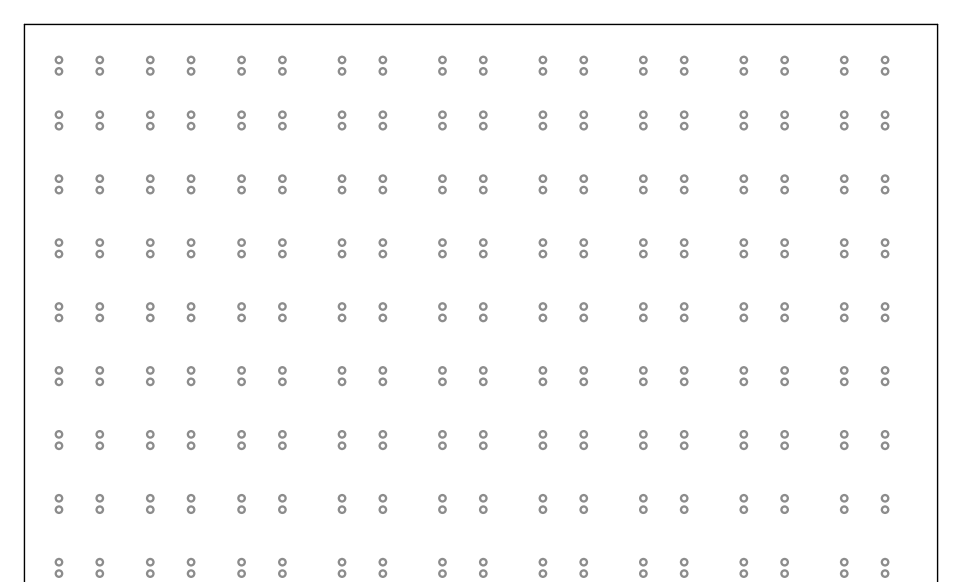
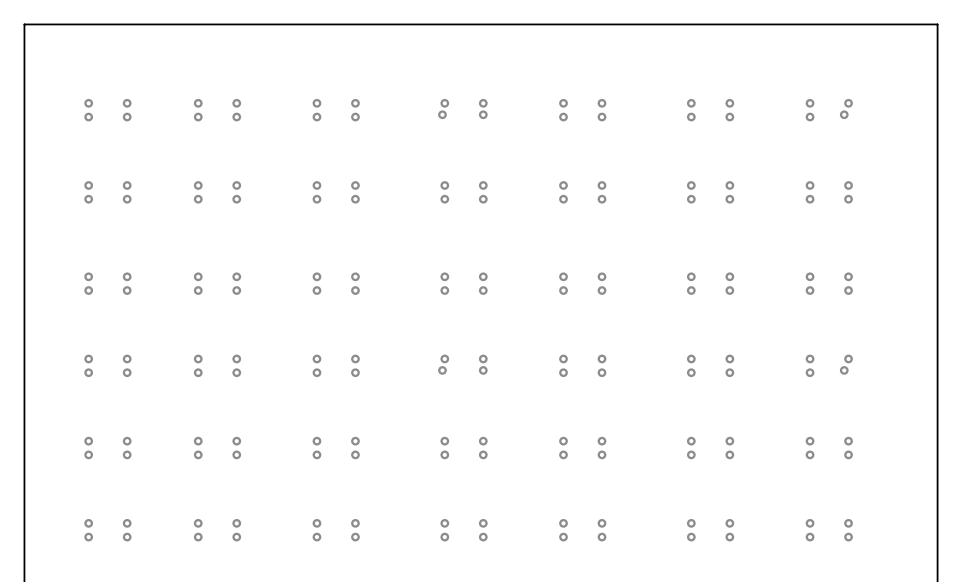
part: (58, 59) -> none
part: (99, 59) -> none
part: (150, 59) -> none
part: (191, 59) -> none
part: (241, 59) -> none
part: (282, 59) -> none
part: (342, 59) -> none
part: (382, 59) -> none
part: (442, 59) -> none
part: (483, 59) -> none
part: (542, 59) -> none
part: (583, 59) -> none
part: (643, 59) -> none
part: (684, 59) -> none
part: (743, 59) -> none
part: (784, 59) -> none
part: (844, 59) -> none
part: (885, 59) -> none
part: (58, 71) -> none
part: (99, 71) -> none
part: (150, 71) -> none
part: (191, 71) -> none
part: (241, 71) -> none
part: (282, 71) -> none
part: (342, 71) -> none
part: (382, 71) -> none
part: (442, 71) -> none
part: (483, 71) -> none
part: (542, 71) -> none
part: (583, 71) -> none
part: (643, 71) -> none
part: (684, 71) -> none
part: (743, 71) -> none
part: (784, 71) -> none
part: (844, 71) -> none
part: (885, 71) -> none
part: none -> (88, 103)
part: none -> (127, 103)
part: none -> (198, 103)
part: none -> (236, 103)
part: none -> (316, 103)
part: none -> (355, 103)
part: none -> (444, 103)
part: none -> (483, 103)
part: none -> (563, 103)
part: none -> (602, 103)
part: none -> (691, 103)
part: none -> (729, 103)
part: none -> (810, 103)
part: none -> (848, 103)
part: (58, 114) -> none
part: (99, 114) -> none
part: (150, 114) -> none
part: (191, 114) -> none
part: (241, 114) -> none
part: (282, 114) -> none
part: (342, 114) -> none
part: (382, 114) -> none
part: (542, 114) -> none
part: (583, 114) -> none
part: (643, 114) -> none
part: (684, 114) -> none
part: (743, 114) -> none
part: (784, 114) -> none
part: (885, 114) -> none
part: none -> (88, 117)
part: none -> (127, 117)
part: none -> (198, 117)
part: none -> (236, 117)
part: none -> (316, 117)
part: none -> (355, 117)
part: none -> (563, 117)
part: none -> (602, 117)
part: none -> (691, 117)
part: none -> (729, 117)
part: none -> (810, 117)
part: (58, 126) -> none
part: (99, 126) -> none
part: (150, 126) -> none
part: (191, 126) -> none
part: (241, 126) -> none
part: (282, 126) -> none
part: (342, 126) -> none
part: (382, 126) -> none
part: (442, 126) -> none
part: (483, 126) -> none
part: (542, 126) -> none
part: (583, 126) -> none
part: (643, 126) -> none
part: (684, 126) -> none
part: (743, 126) -> none
part: (784, 126) -> none
part: (844, 126) -> none
part: (885, 126) -> none
part: (58, 178) -> none
part: (99, 178) -> none
part: (150, 178) -> none
part: (191, 178) -> none
part: (241, 178) -> none
part: (282, 178) -> none
part: (342, 178) -> none
part: (382, 178) -> none
part: (442, 178) -> none
part: (483, 178) -> none
part: (542, 178) -> none
part: (583, 178) -> none
part: (643, 178) -> none
part: (684, 178) -> none
part: (743, 178) -> none
part: (784, 178) -> none
part: (844, 178) -> none
part: (885, 178) -> none
part: none -> (88, 185)
part: none -> (127, 185)
part: none -> (198, 185)
part: none -> (236, 185)
part: none -> (316, 185)
part: none -> (355, 185)
part: none -> (444, 185)
part: none -> (483, 185)
part: none -> (563, 185)
part: none -> (602, 185)
part: none -> (691, 185)
part: none -> (729, 185)
part: none -> (810, 185)
part: none -> (848, 185)
part: (58, 190) -> none
part: (99, 190) -> none
part: (150, 190) -> none
part: (191, 190) -> none
part: (241, 190) -> none
part: (282, 190) -> none
part: (342, 190) -> none
part: (382, 190) -> none
part: (442, 190) -> none
part: (483, 190) -> none
part: (542, 190) -> none
part: (583, 190) -> none
part: (643, 190) -> none
part: (684, 190) -> none
part: (743, 190) -> none
part: (784, 190) -> none
part: (844, 190) -> none
part: (885, 190) -> none
part: none -> (88, 199)
part: none -> (127, 199)
part: none -> (198, 199)
part: none -> (236, 199)
part: none -> (316, 199)
part: none -> (355, 199)
part: none -> (444, 199)
part: none -> (483, 199)
part: none -> (563, 199)
part: none -> (602, 199)
part: none -> (691, 199)
part: none -> (729, 199)
part: none -> (810, 199)
part: none -> (848, 199)
part: (58, 242) -> none
part: (99, 242) -> none
part: (150, 242) -> none
part: (191, 242) -> none
part: (241, 242) -> none
part: (282, 242) -> none
part: (342, 242) -> none
part: (382, 242) -> none
part: (442, 242) -> none
part: (483, 242) -> none
part: (542, 242) -> none
part: (583, 242) -> none
part: (643, 242) -> none
part: (684, 242) -> none
part: (743, 242) -> none
part: (784, 242) -> none
part: (844, 242) -> none
part: (885, 242) -> none
part: (58, 254) -> none
part: (99, 254) -> none
part: (150, 254) -> none
part: (191, 254) -> none
part: (241, 254) -> none
part: (282, 254) -> none
part: (342, 254) -> none
part: (382, 254) -> none
part: (442, 254) -> none
part: (483, 254) -> none
part: (542, 254) -> none
part: (583, 254) -> none
part: (643, 254) -> none
part: (684, 254) -> none
part: (743, 254) -> none
part: (784, 254) -> none
part: (844, 254) -> none
part: (885, 254) -> none
part: none -> (88, 276)
part: none -> (127, 276)
part: none -> (198, 276)
part: none -> (236, 276)
part: none -> (316, 276)
part: none -> (355, 276)
part: none -> (444, 276)
part: none -> (483, 276)
part: none -> (563, 276)
part: none -> (602, 276)
part: none -> (691, 276)
part: none -> (729, 276)
part: none -> (810, 276)
part: none -> (848, 276)
part: none -> (88, 290)
part: none -> (127, 290)
part: none -> (198, 290)
part: none -> (236, 290)
part: none -> (316, 290)
part: none -> (355, 290)
part: none -> (444, 290)
part: none -> (483, 290)
part: none -> (563, 290)
part: none -> (602, 290)
part: none -> (691, 290)
part: none -> (729, 290)
part: none -> (810, 290)
part: none -> (848, 290)
part: (58, 306) -> none
part: (99, 306) -> none
part: (150, 306) -> none
part: (191, 306) -> none
part: (241, 306) -> none
part: (282, 306) -> none
part: (342, 306) -> none
part: (382, 306) -> none
part: (442, 306) -> none
part: (483, 306) -> none
part: (542, 306) -> none
part: (583, 306) -> none
part: (643, 306) -> none
part: (684, 306) -> none
part: (743, 306) -> none
part: (784, 306) -> none
part: (844, 306) -> none
part: (885, 306) -> none
part: (58, 317) -> none
part: (99, 317) -> none
part: (150, 317) -> none
part: (191, 317) -> none
part: (241, 317) -> none
part: (282, 317) -> none
part: (342, 317) -> none
part: (382, 317) -> none
part: (442, 317) -> none
part: (483, 317) -> none
part: (542, 317) -> none
part: (583, 317) -> none
part: (643, 317) -> none
part: (684, 317) -> none
part: (743, 317) -> none
part: (784, 317) -> none
part: (844, 317) -> none
part: (885, 317) -> none
part: none -> (88, 358)
part: none -> (127, 358)
part: none -> (198, 358)
part: none -> (236, 358)
part: none -> (316, 358)
part: none -> (355, 358)
part: none -> (444, 358)
part: none -> (483, 358)
part: none -> (563, 358)
part: none -> (602, 358)
part: none -> (691, 358)
part: none -> (729, 358)
part: none -> (810, 358)
part: none -> (848, 358)
part: (58, 370) -> none
part: (99, 370) -> none
part: (150, 370) -> none
part: (191, 370) -> none
part: (241, 370) -> none
part: (282, 370) -> none
part: (342, 370) -> none
part: (382, 370) -> none
part: (542, 370) -> none
part: (583, 370) -> none
part: (643, 370) -> none
part: (684, 370) -> none
part: (743, 370) -> none
part: (784, 370) -> none
part: (885, 370) -> none
part: none -> (88, 372)
part: none -> (127, 372)
part: none -> (198, 372)
part: none -> (236, 372)
part: none -> (316, 372)
part: none -> (355, 372)
part: none -> (563, 372)
part: none -> (602, 372)
part: none -> (691, 372)
part: none -> (729, 372)
part: none -> (810, 372)
part: (58, 381) -> none
part: (99, 381) -> none
part: (150, 381) -> none
part: (191, 381) -> none
part: (241, 381) -> none
part: (282, 381) -> none
part: (342, 381) -> none
part: (382, 381) -> none
part: (442, 381) -> none
part: (483, 381) -> none
part: (542, 381) -> none
part: (583, 381) -> none
part: (643, 381) -> none
part: (684, 381) -> none
part: (743, 381) -> none
part: (784, 381) -> none
part: (844, 381) -> none
part: (885, 381) -> none
part: (58, 434) -> none
part: (99, 434) -> none
part: (150, 434) -> none
part: (191, 434) -> none
part: (241, 434) -> none
part: (282, 434) -> none
part: (342, 434) -> none
part: (382, 434) -> none
part: (442, 434) -> none
part: (483, 434) -> none
part: (542, 434) -> none
part: (583, 434) -> none
part: (643, 434) -> none
part: (684, 434) -> none
part: (743, 434) -> none
part: (784, 434) -> none
part: (844, 434) -> none
part: (885, 434) -> none
part: none -> (88, 441)
part: none -> (127, 441)
part: none -> (198, 441)
part: none -> (236, 441)
part: none -> (316, 441)
part: none -> (355, 441)
part: none -> (444, 441)
part: none -> (483, 441)
part: none -> (563, 441)
part: none -> (602, 441)
part: none -> (691, 441)
part: none -> (729, 441)
part: none -> (810, 441)
part: none -> (848, 441)
part: (58, 445) -> none
part: (99, 445) -> none
part: (150, 445) -> none
part: (191, 445) -> none
part: (241, 445) -> none
part: (282, 445) -> none
part: (342, 445) -> none
part: (382, 445) -> none
part: (442, 445) -> none
part: (483, 445) -> none
part: (542, 445) -> none
part: (583, 445) -> none
part: (643, 445) -> none
part: (684, 445) -> none
part: (743, 445) -> none
part: (784, 445) -> none
part: (844, 445) -> none
part: (885, 445) -> none
part: none -> (88, 454)
part: none -> (127, 454)
part: none -> (198, 454)
part: none -> (236, 454)
part: none -> (316, 454)
part: none -> (355, 454)
part: none -> (444, 454)
part: none -> (483, 454)
part: none -> (563, 454)
part: none -> (602, 454)
part: none -> (691, 454)
part: none -> (729, 454)
part: none -> (810, 454)
part: none -> (848, 454)
part: (58, 498) -> none
part: (99, 498) -> none
part: (150, 498) -> none
part: (191, 498) -> none
part: (241, 498) -> none
part: (282, 498) -> none
part: (342, 498) -> none
part: (382, 498) -> none
part: (442, 498) -> none
part: (483, 498) -> none
part: (542, 498) -> none
part: (583, 498) -> none
part: (643, 498) -> none
part: (684, 498) -> none
part: (743, 498) -> none
part: (784, 498) -> none
part: (844, 498) -> none
part: (885, 498) -> none
part: (58, 509) -> none
part: (99, 509) -> none
part: (150, 509) -> none
part: (191, 509) -> none
part: (241, 509) -> none
part: (282, 509) -> none
part: (342, 509) -> none
part: (382, 509) -> none
part: (442, 509) -> none
part: (483, 509) -> none
part: (542, 509) -> none
part: (583, 509) -> none
part: (643, 509) -> none
part: (684, 509) -> none
part: (743, 509) -> none
part: (784, 509) -> none
part: (844, 509) -> none
part: (885, 509) -> none
part: none -> (88, 523)
part: none -> (127, 523)
part: none -> (198, 523)
part: none -> (236, 523)
part: none -> (316, 523)
part: none -> (355, 523)
part: none -> (444, 523)
part: none -> (483, 523)
part: none -> (563, 523)
part: none -> (602, 523)
part: none -> (691, 523)
part: none -> (729, 523)
part: none -> (810, 523)
part: none -> (848, 523)
part: none -> (88, 537)
part: none -> (127, 537)
part: none -> (198, 537)
part: none -> (236, 537)
part: none -> (316, 537)
part: none -> (355, 537)
part: none -> (444, 537)
part: none -> (483, 537)
part: none -> (563, 537)
part: none -> (602, 537)
part: none -> (691, 537)
part: none -> (729, 537)
part: none -> (810, 537)
part: none -> (848, 537)
part: (58, 562) -> none
part: (99, 562) -> none
part: (150, 562) -> none
part: (191, 562) -> none
part: (241, 562) -> none
part: (282, 562) -> none
part: (342, 562) -> none
part: (382, 562) -> none
part: (442, 562) -> none
part: (483, 562) -> none
part: (542, 562) -> none
part: (583, 562) -> none
part: (643, 562) -> none
part: (684, 562) -> none
part: (743, 562) -> none
part: (784, 562) -> none
part: (844, 562) -> none
part: (885, 562) -> none
part: (58, 573) -> none
part: (99, 573) -> none
part: (150, 573) -> none
part: (191, 573) -> none
part: (241, 573) -> none
part: (282, 573) -> none
part: (342, 573) -> none
part: (382, 573) -> none
part: (442, 573) -> none
part: (483, 573) -> none
part: (542, 573) -> none
part: (583, 573) -> none
part: (643, 573) -> none
part: (684, 573) -> none
part: (743, 573) -> none
part: (784, 573) -> none
part: (844, 573) -> none
part: (885, 573) -> none

